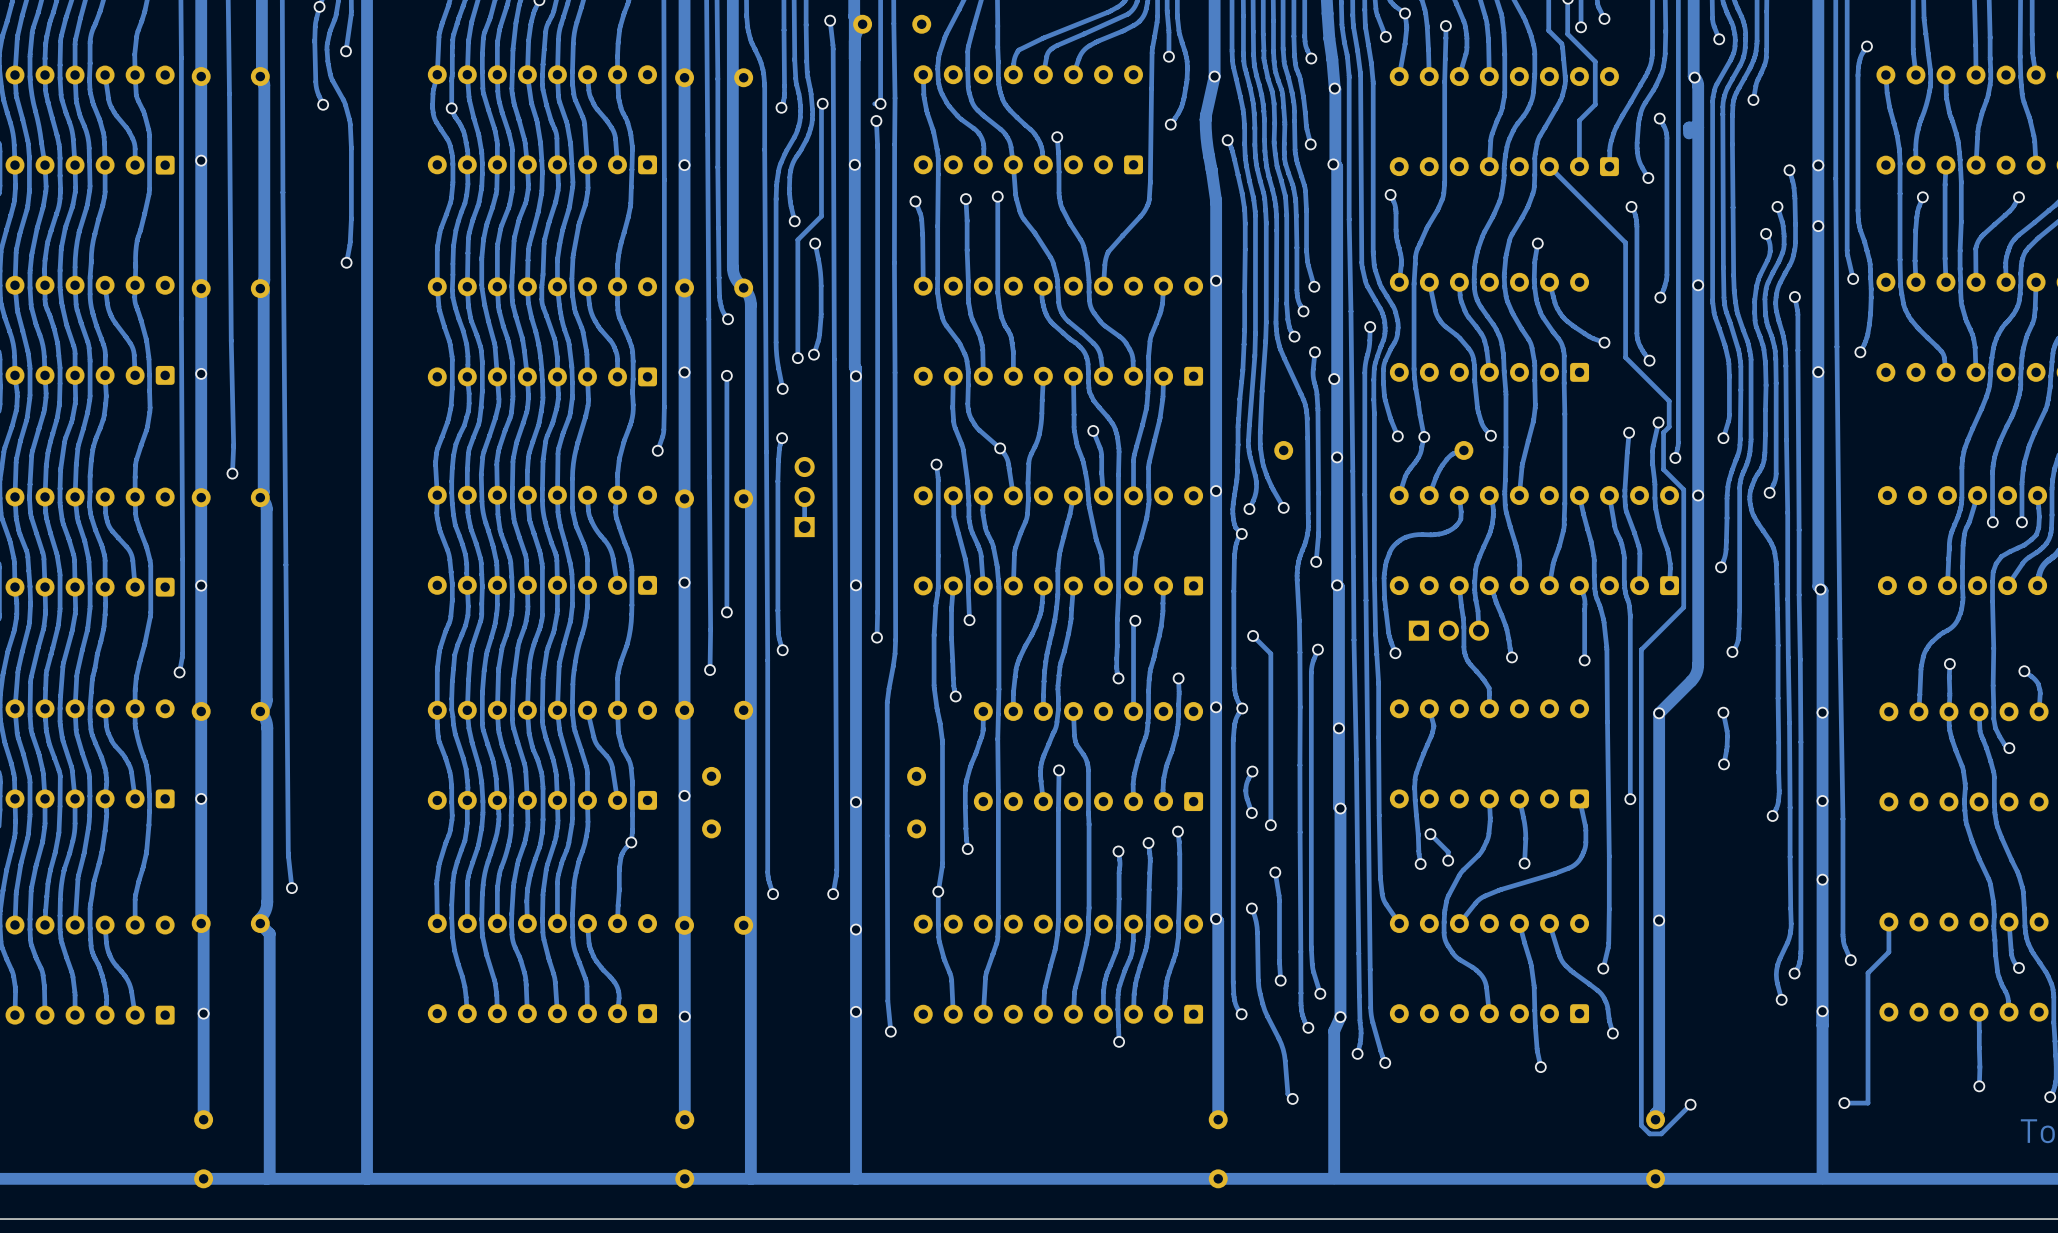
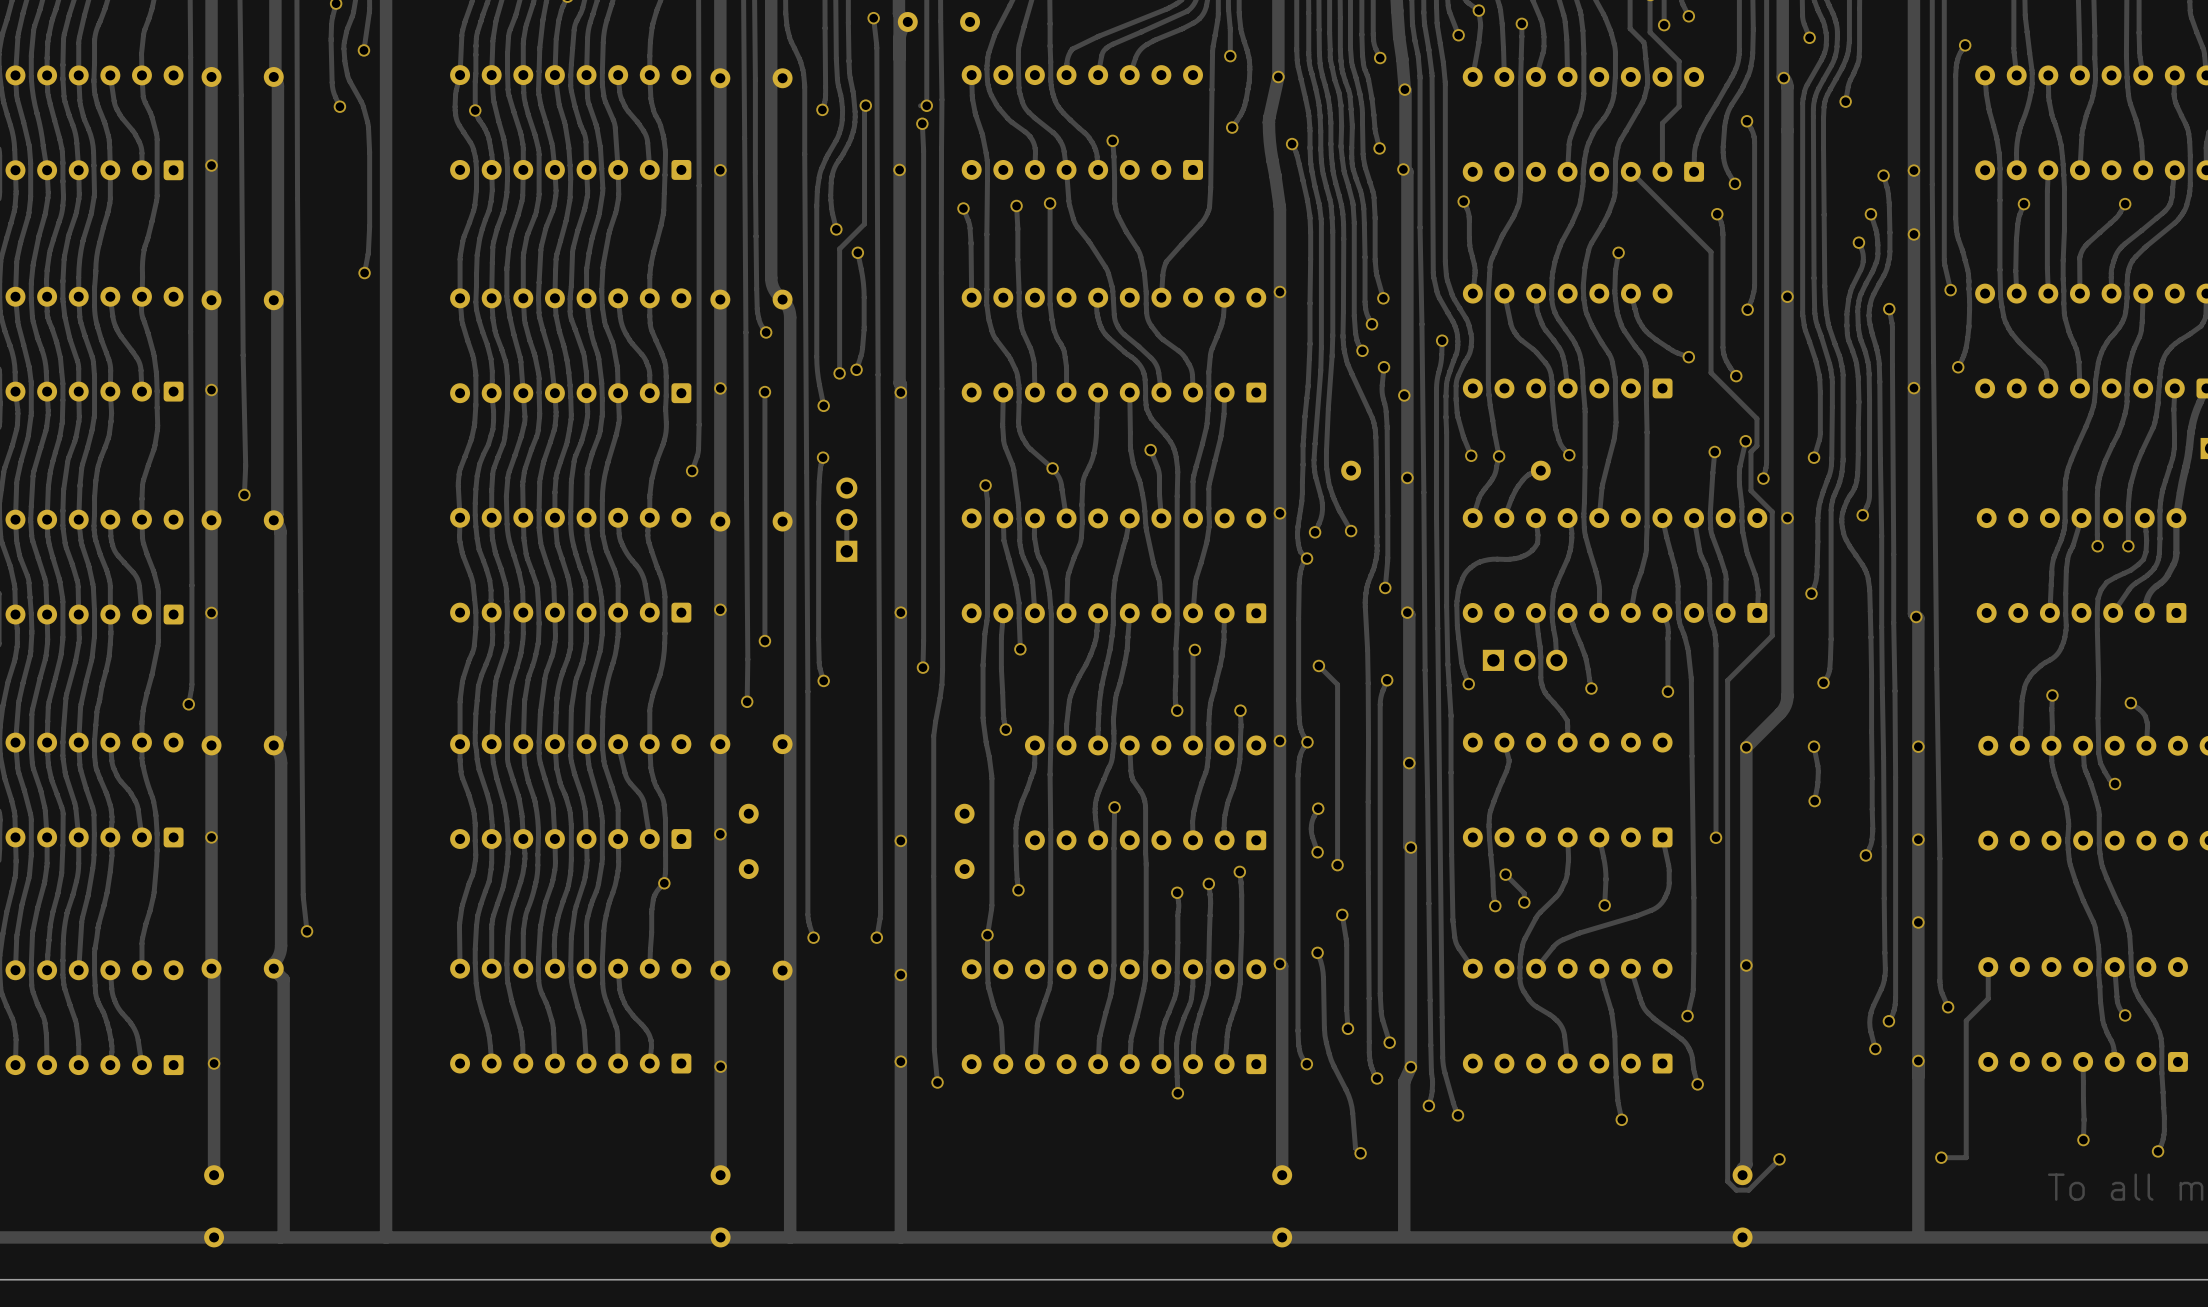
track: (1698, 127) (1689, 127) (1689, 133) -> none

